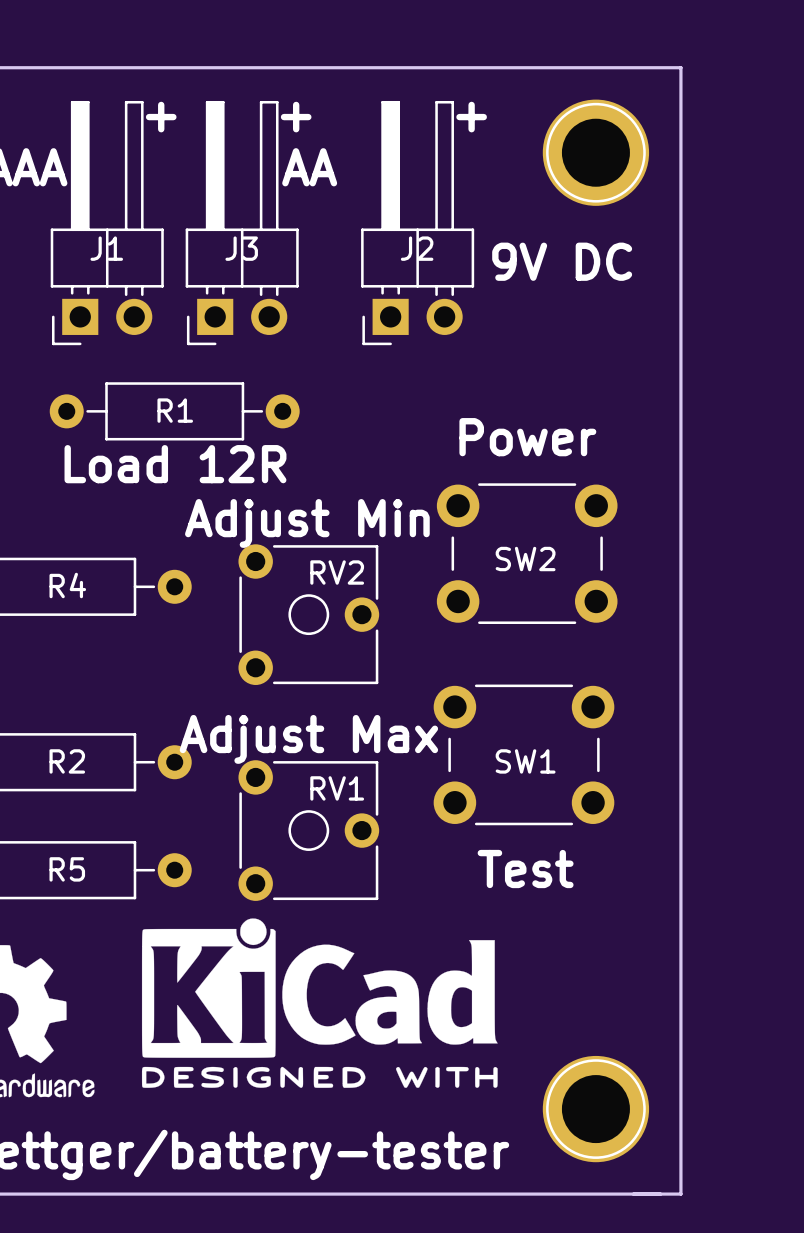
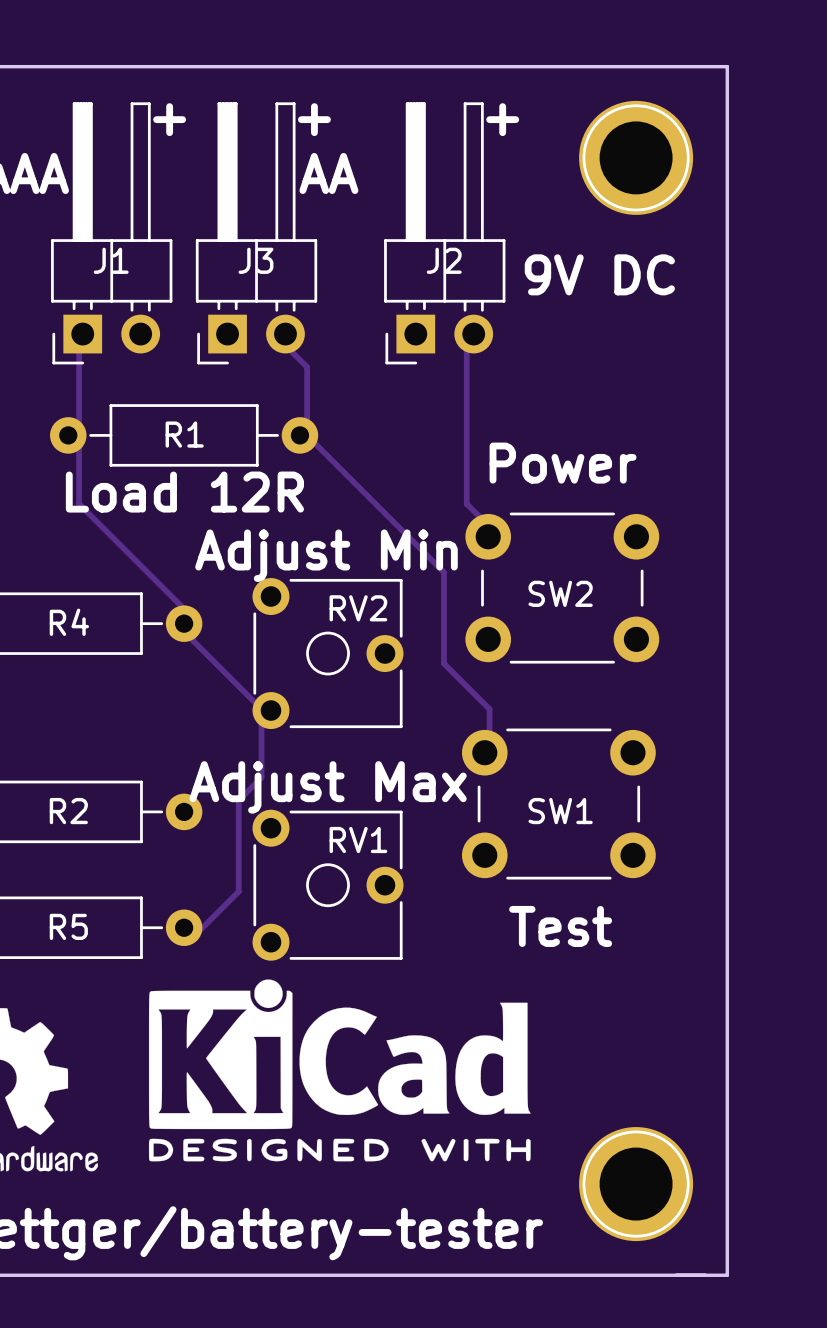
track: none -> (82, 334) (79, 344) (79, 503) (193, 617)
track: none -> (285, 334) (284, 344) (307, 367) (307, 435)
track: none -> (473, 334) (466, 344) (466, 503) (489, 526) (488, 536)
track: none -> (307, 435) (443, 572) (443, 663) (489, 709) (489, 754) (484, 752)
track: none -> (193, 617) (193, 640) (261, 709)
track: none -> (261, 709) (261, 777) (238, 800) (238, 891) (193, 937) (184, 927)

